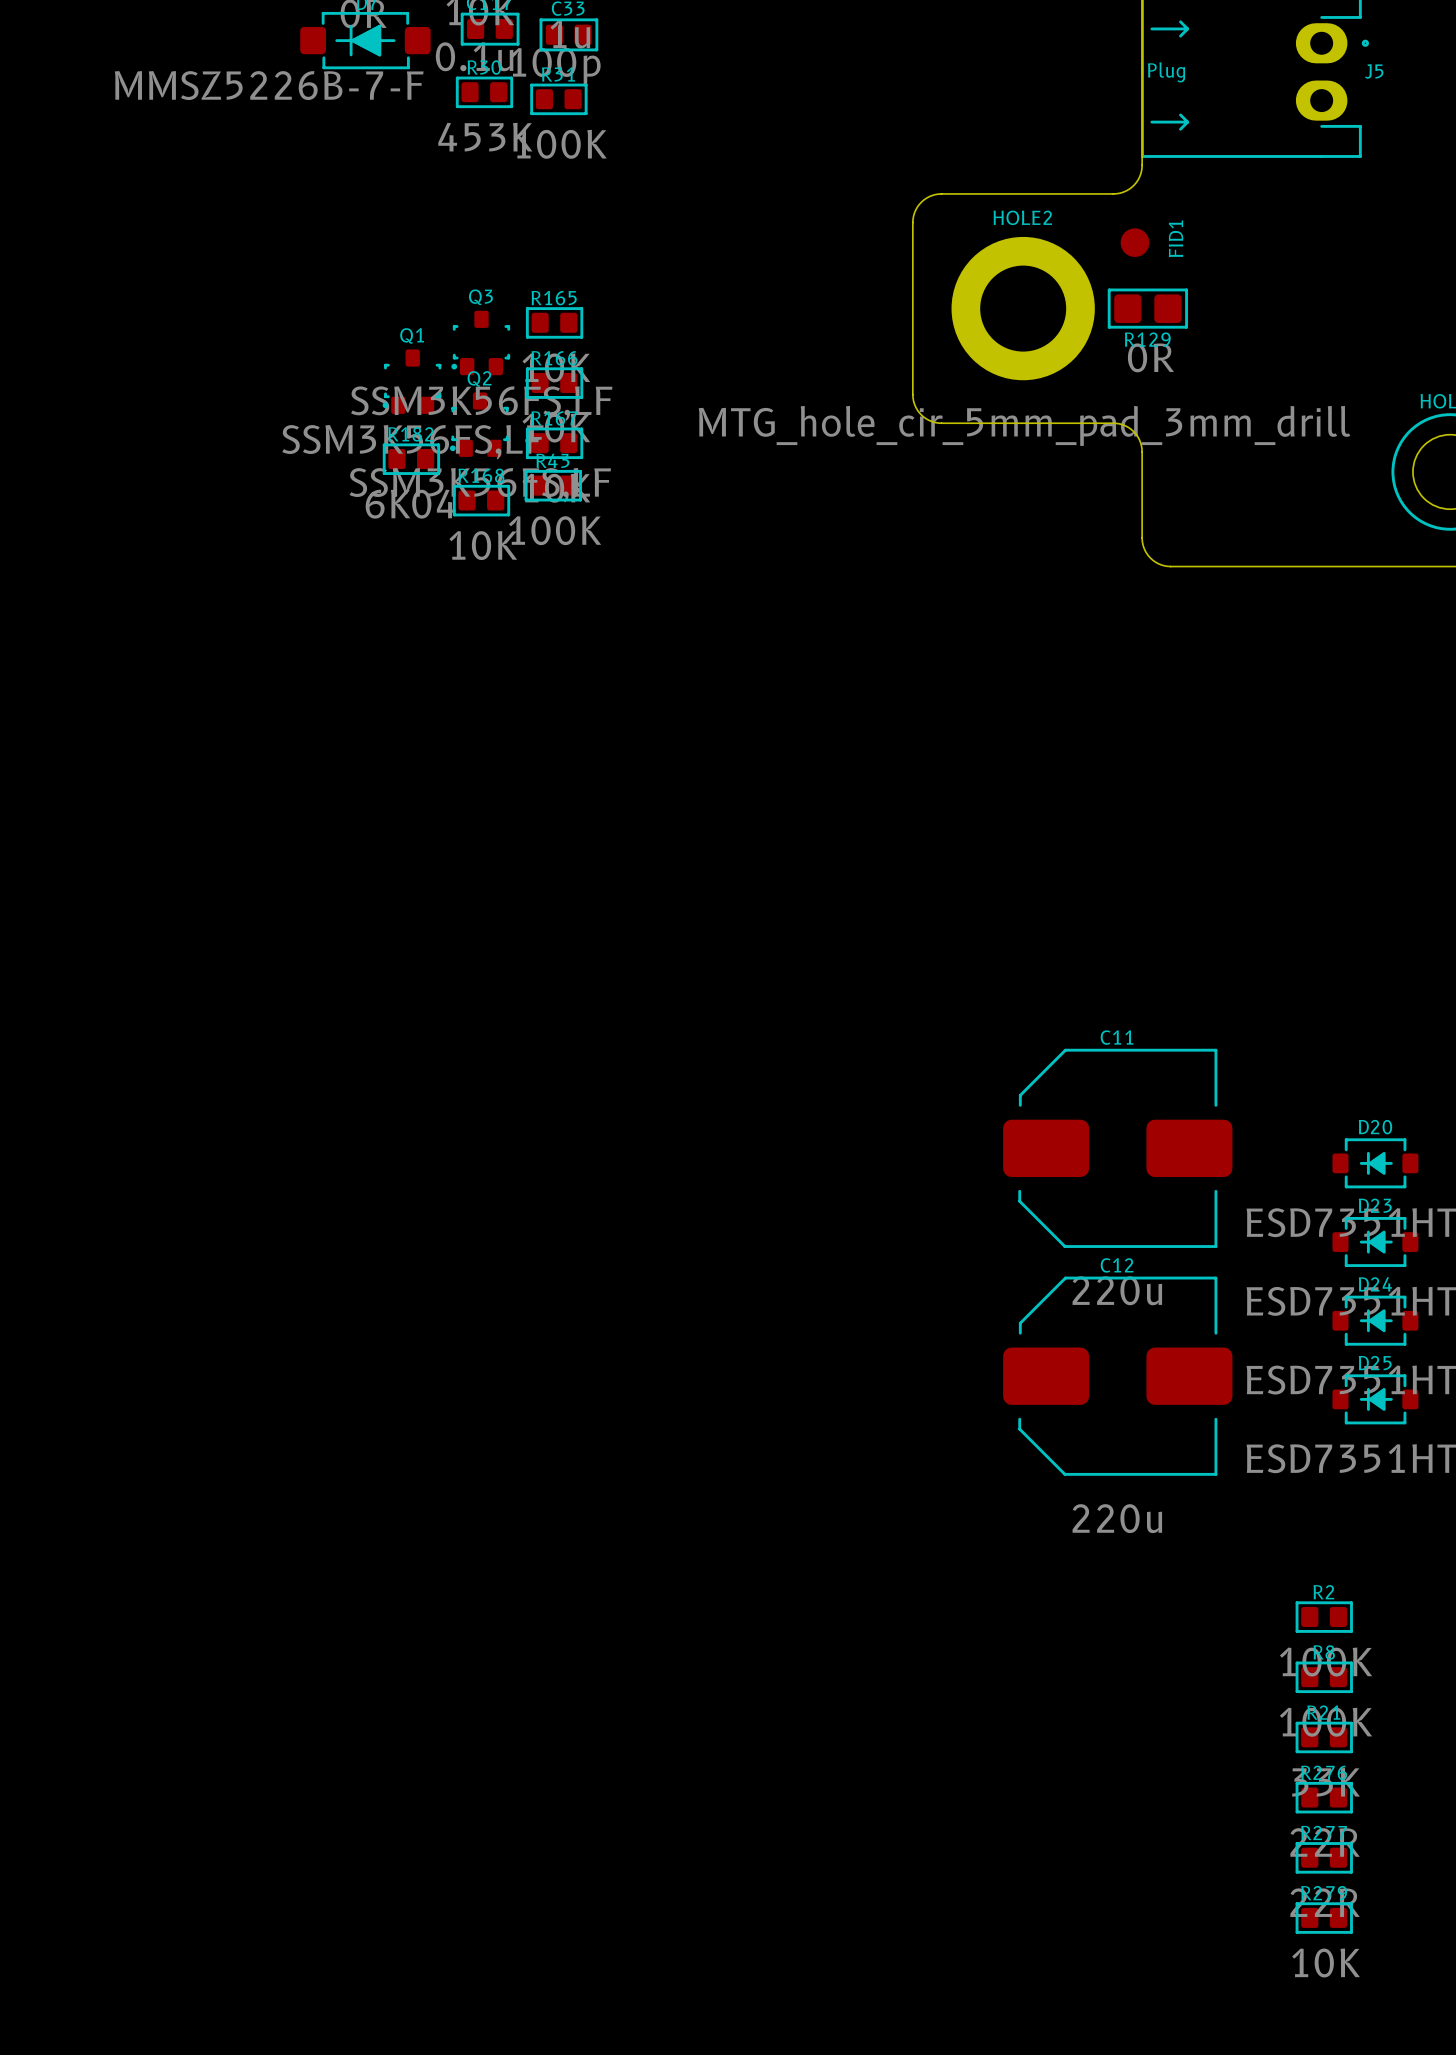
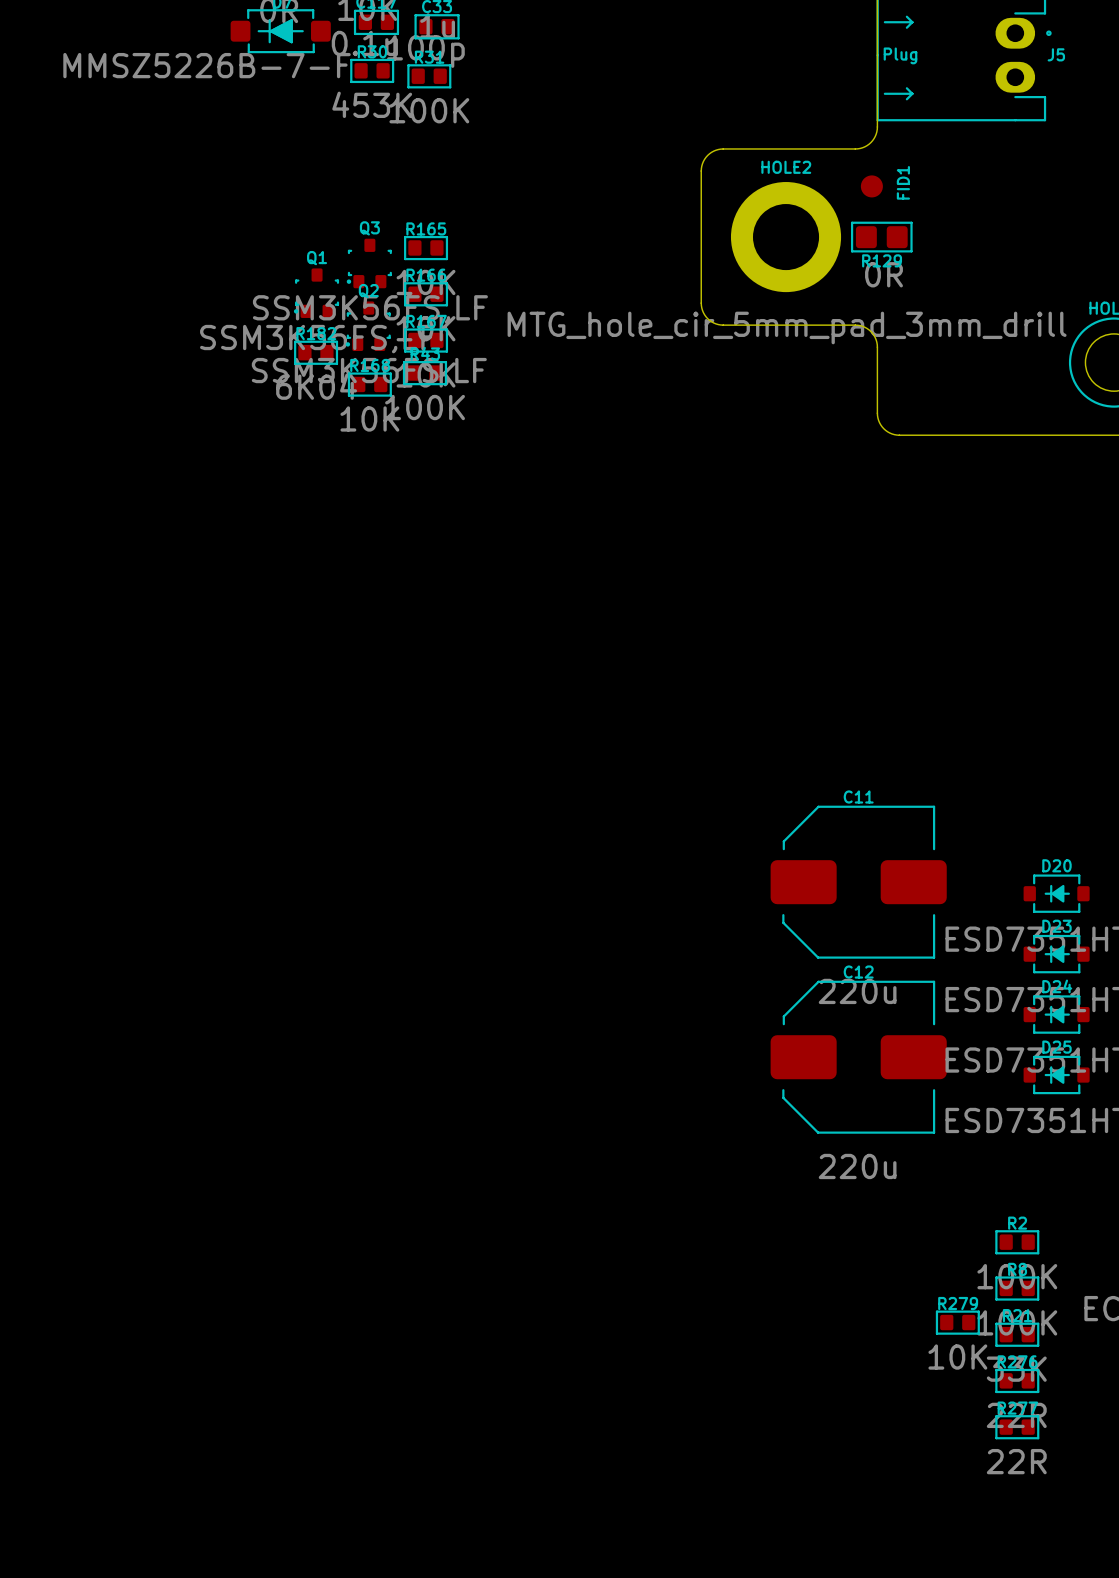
R279 position: (1324, 1918) -> (957, 1322)

